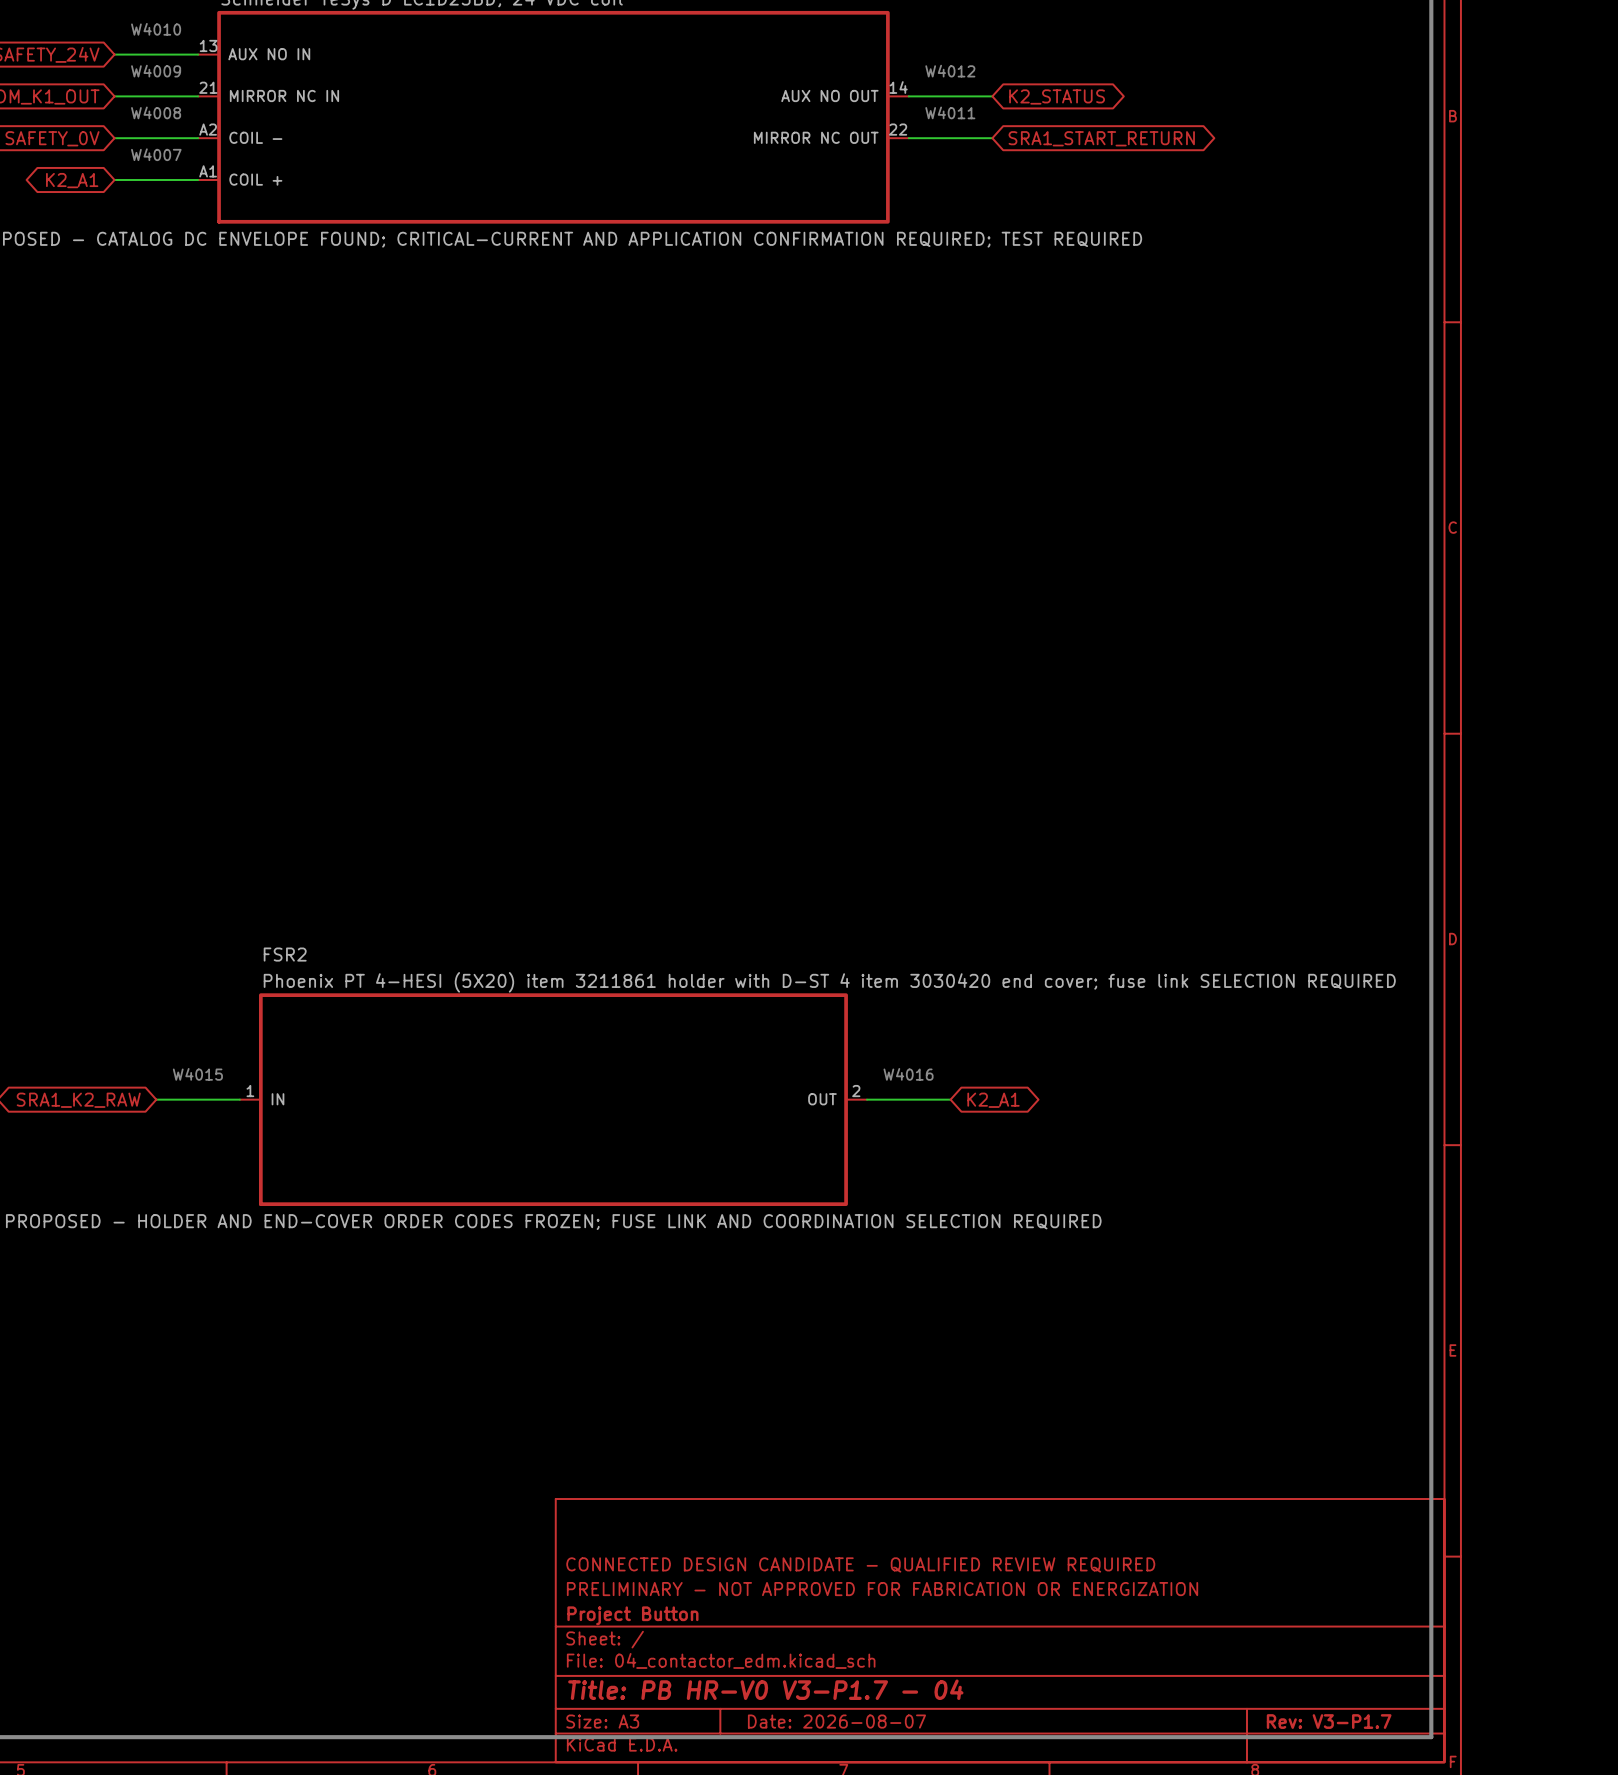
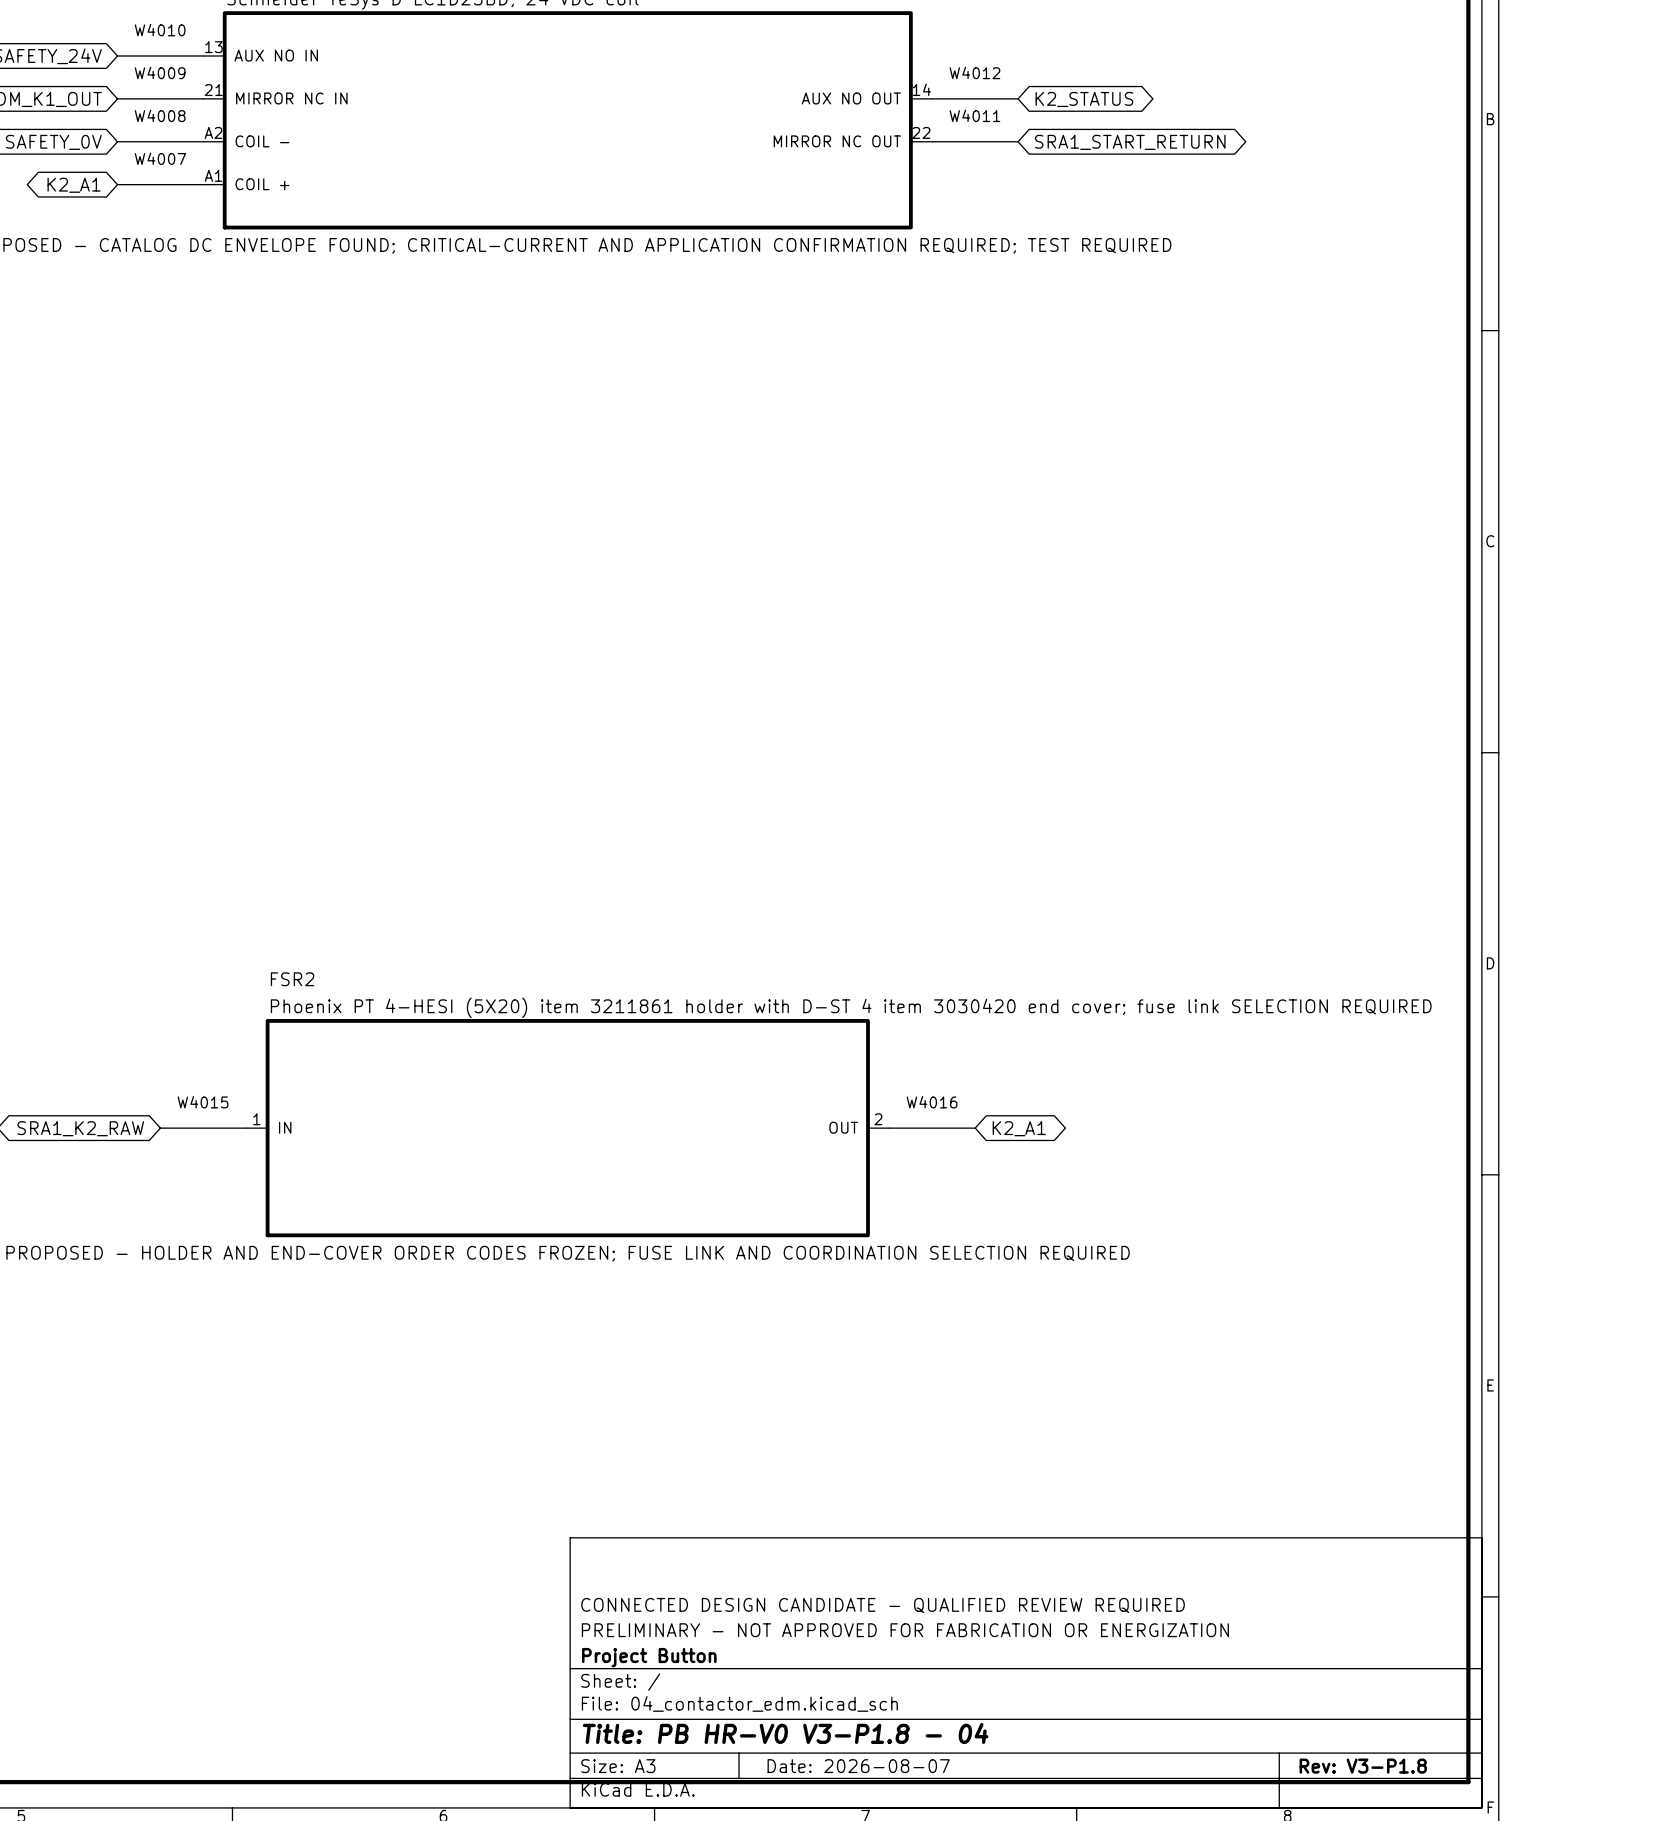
title block: Title: PB HR-V0 V3-P1.7 - 04 (765, 1689) -> Title: PB HR-V0 V3-P1.8 - 04 (785, 1733)
title block: Rev: V3-P1.7 (1329, 1721) -> Rev: V3-P1.8 (1363, 1766)

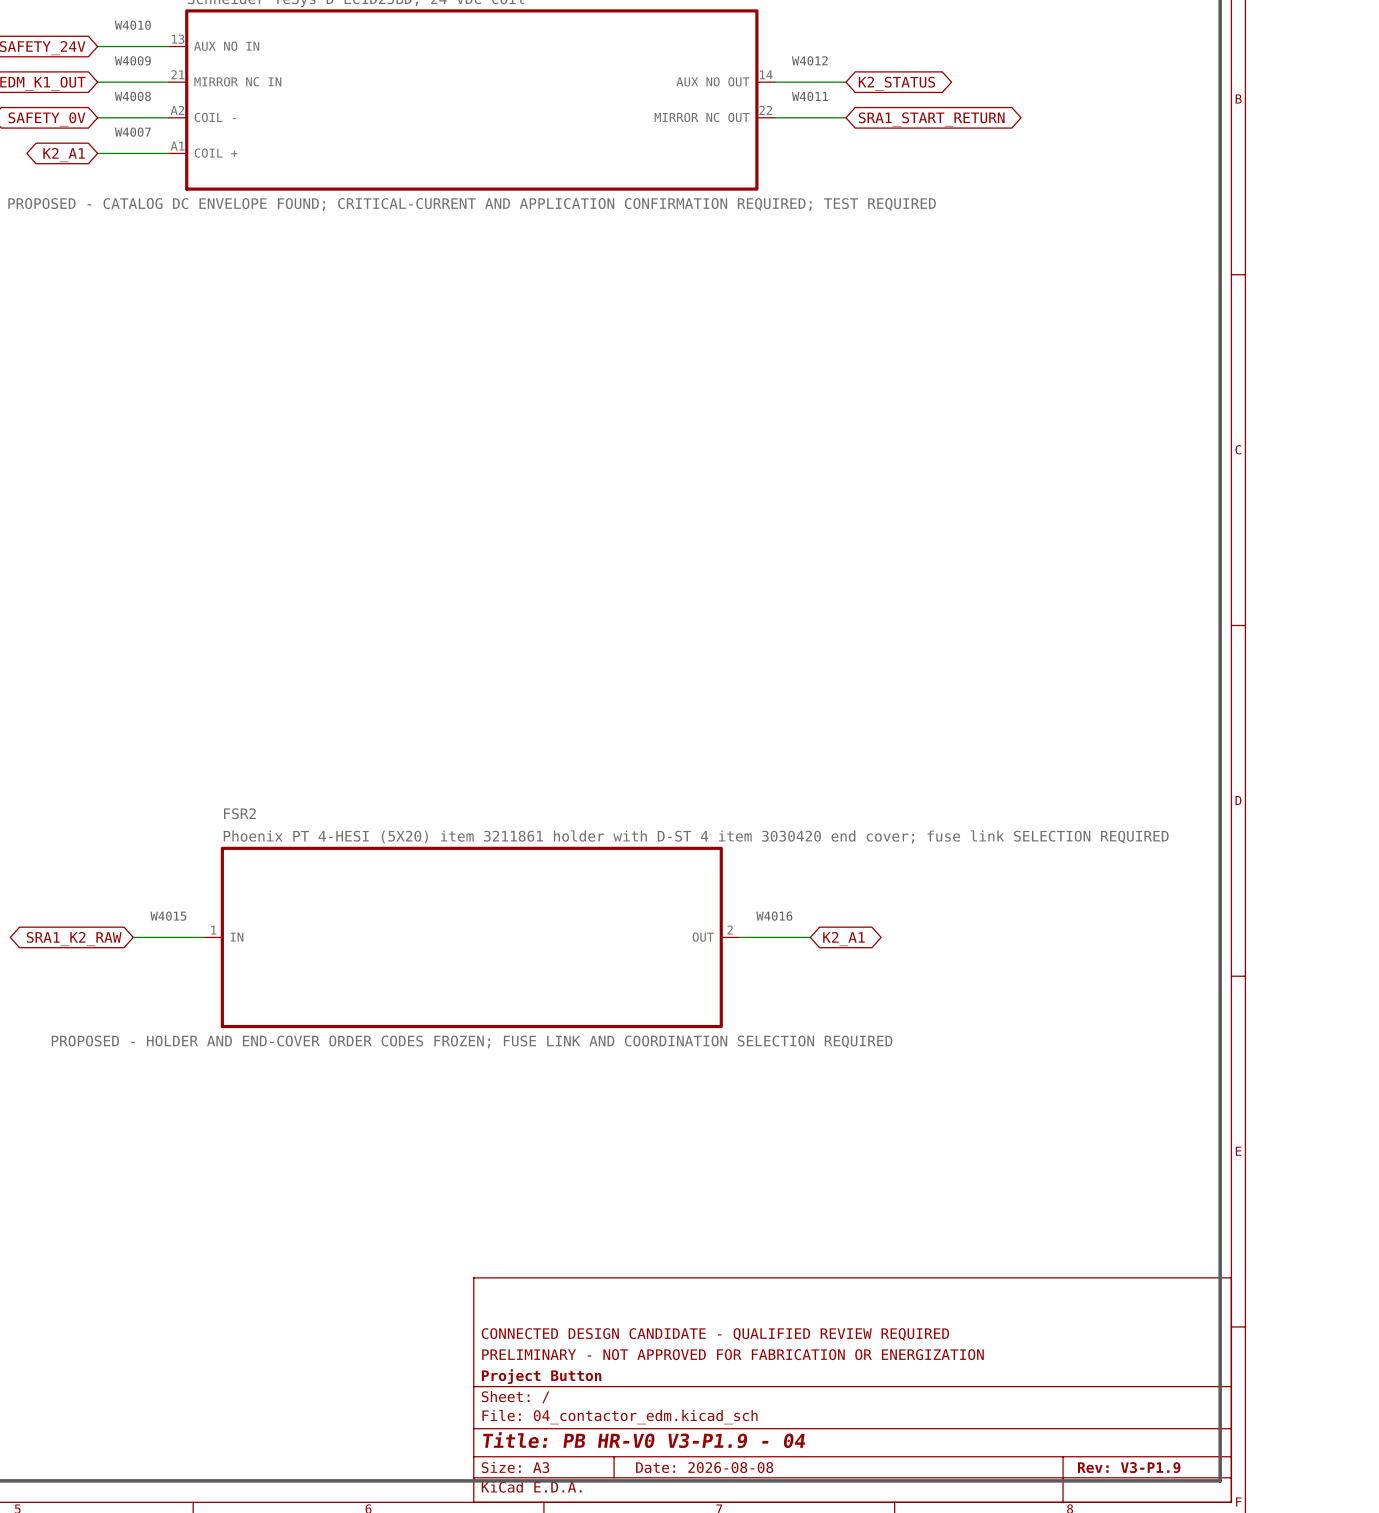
title block: Title: PB HR-V0 V3-P1.8 - 04 (785, 1733) -> Title: PB HR-V0 V3-P1.9 - 04 (644, 1440)
title block: Date: 2026-08-07 (858, 1766) -> Date: 2026-08-08 (704, 1467)
title block: Rev: V3-P1.8 (1363, 1766) -> Rev: V3-P1.9 (1129, 1467)

